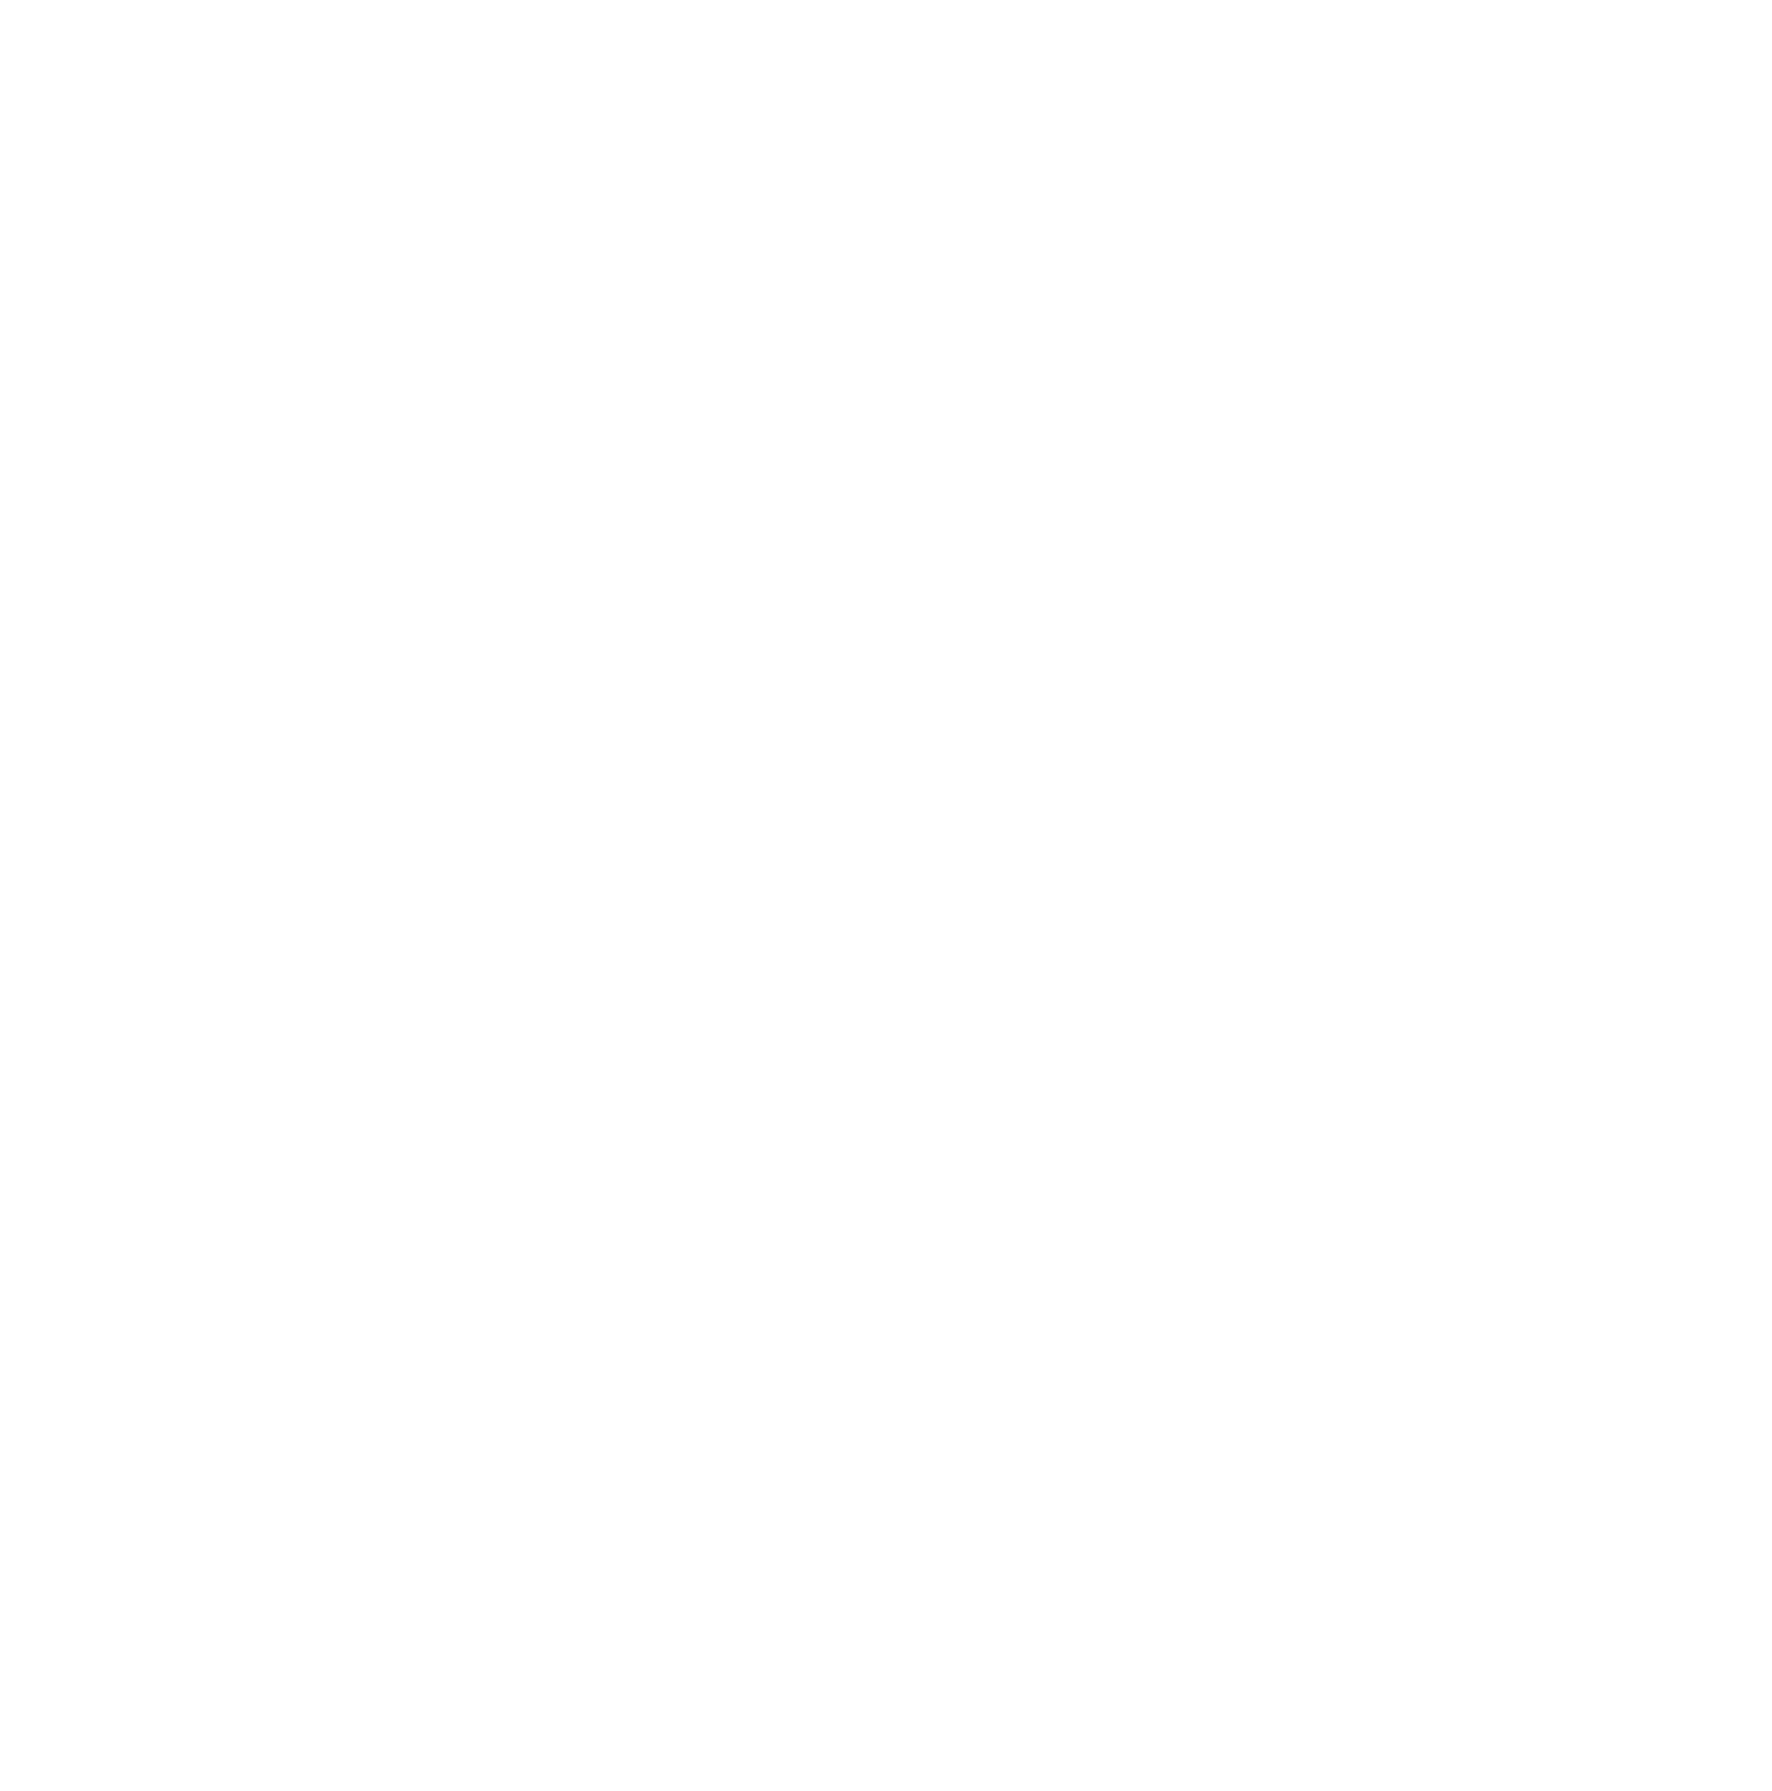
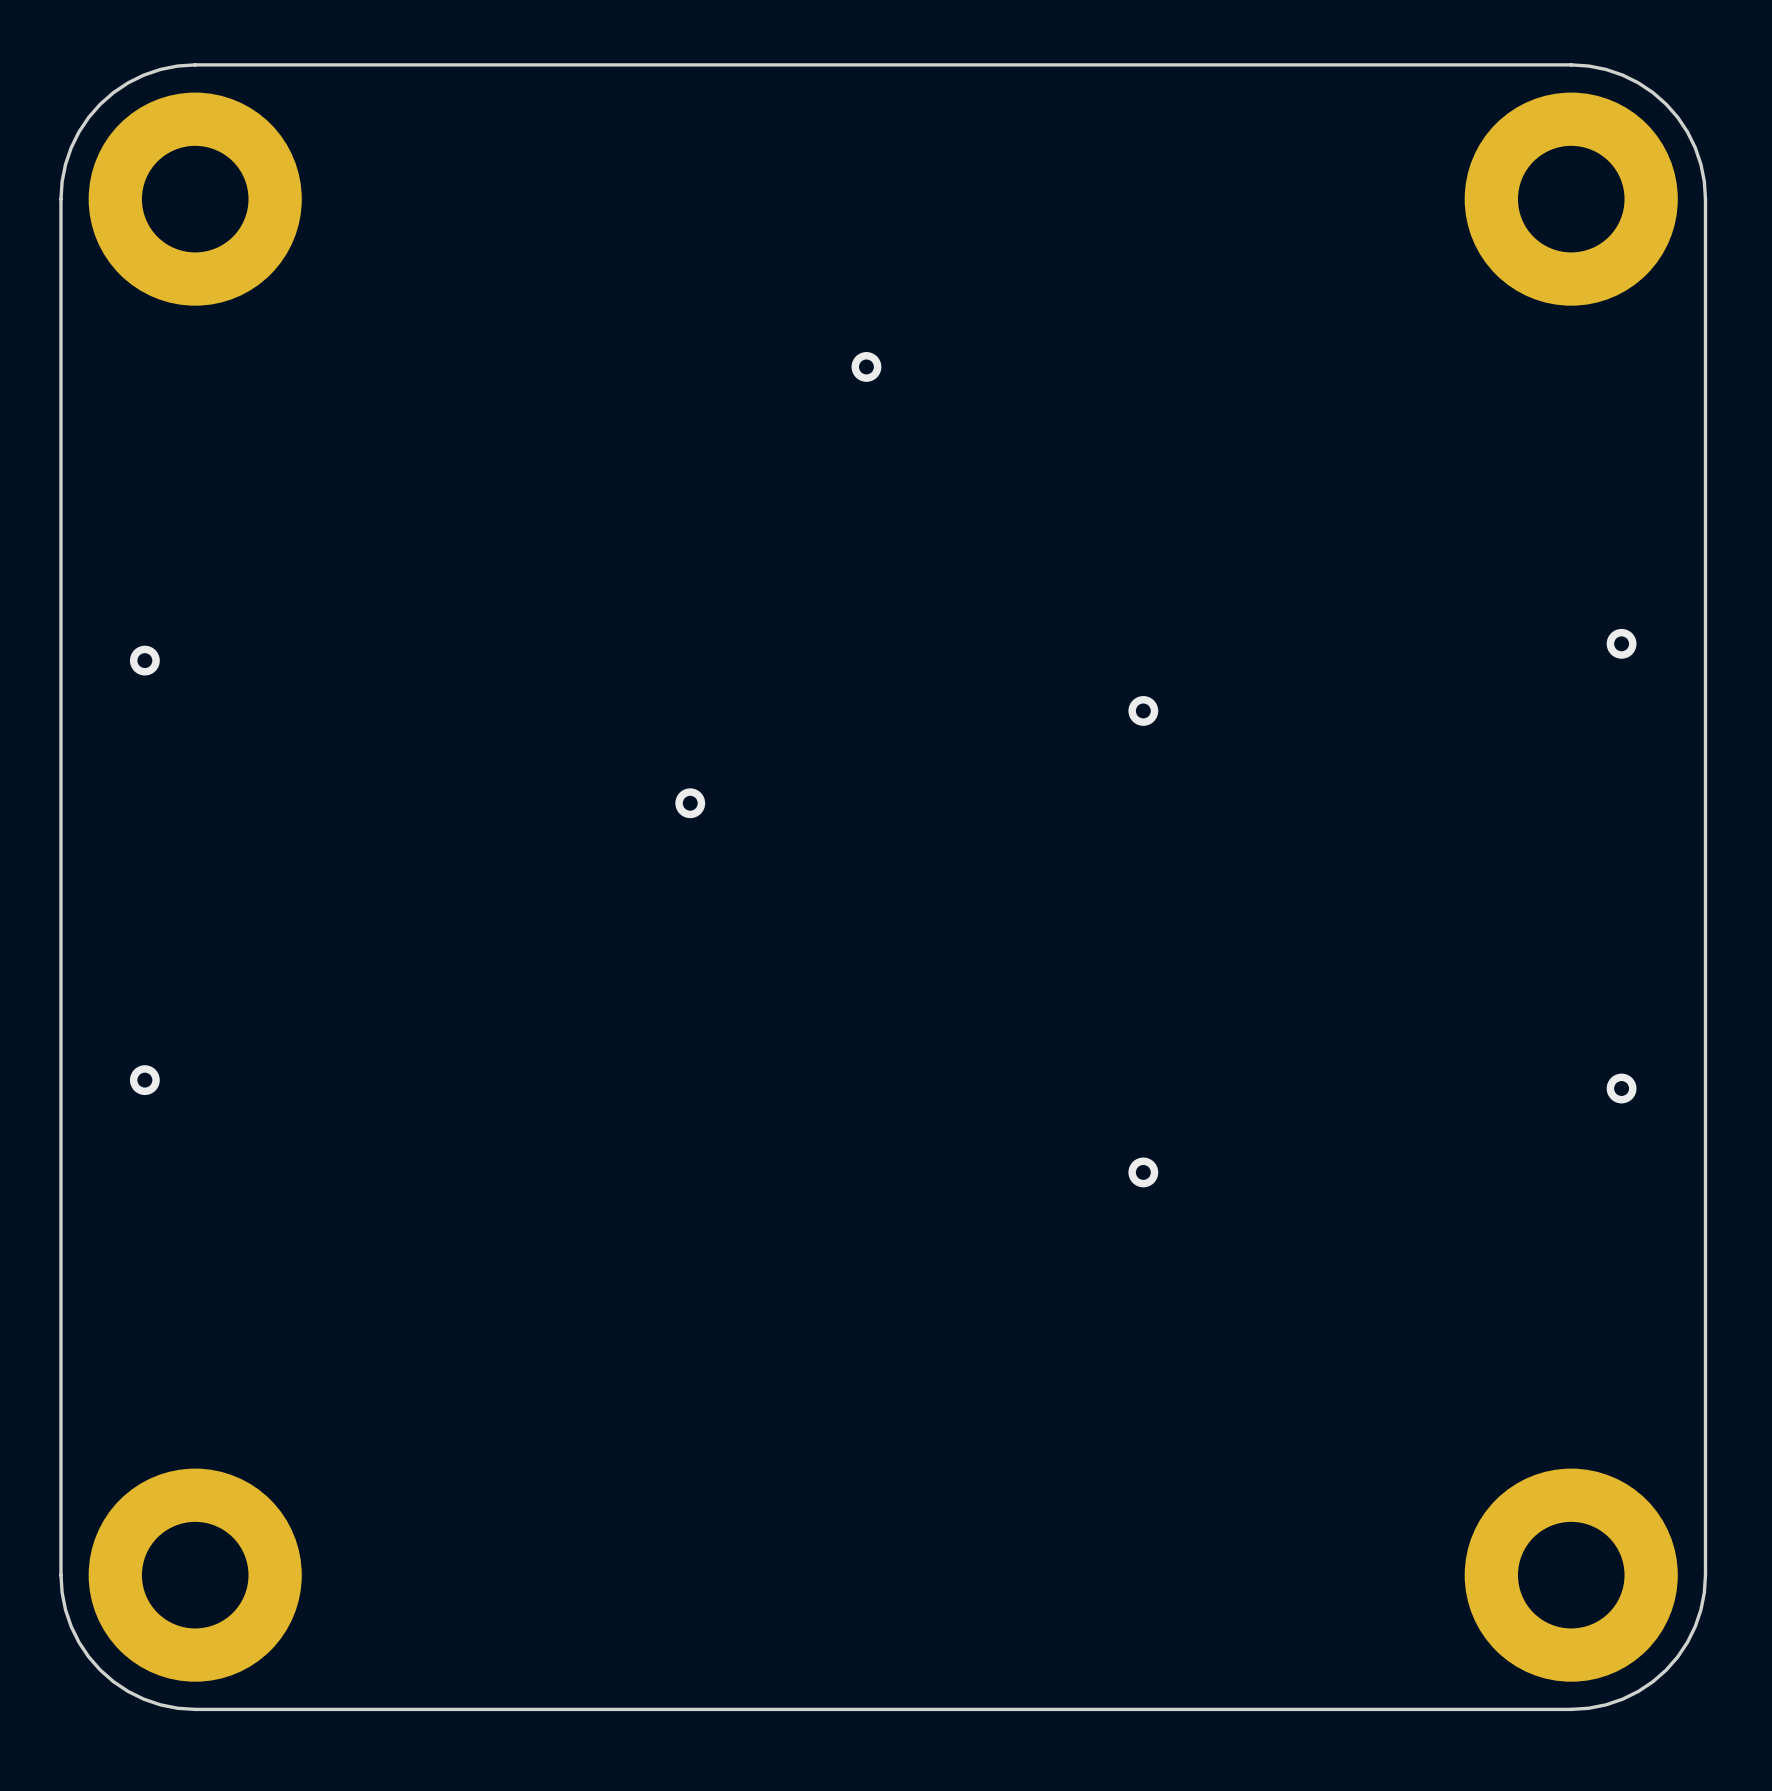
board edge: none -> (1571, 64) (195, 64) (177, 66) (143, 75) (113, 92) (100, 104) (78, 132) (71, 147) (62, 181) (60, 199) (60, 1575) (62, 1592) (71, 1626) (78, 1642) (100, 1670) (128, 1691) (143, 1699) (177, 1708) (195, 1709) (1571, 1709) (1588, 1708) (1622, 1699) (1638, 1691) (1666, 1670) (1677, 1656) (1695, 1626) (1704, 1592) (1705, 1575) (1705, 199) (1700, 164) (1695, 147) (1687, 132) (1666, 104) (1652, 92) (1622, 75) (1605, 69) (1571, 64)
part: none -> (195, 199)
part: none -> (1571, 199)
via: none -> (866, 366)
via: none -> (1621, 643)
via: none -> (144, 660)
via: none -> (1143, 710)
via: none -> (690, 803)
via: none -> (144, 1080)
via: none -> (1621, 1088)
via: none -> (1143, 1172)
part: none -> (195, 1575)
part: none -> (1571, 1575)

